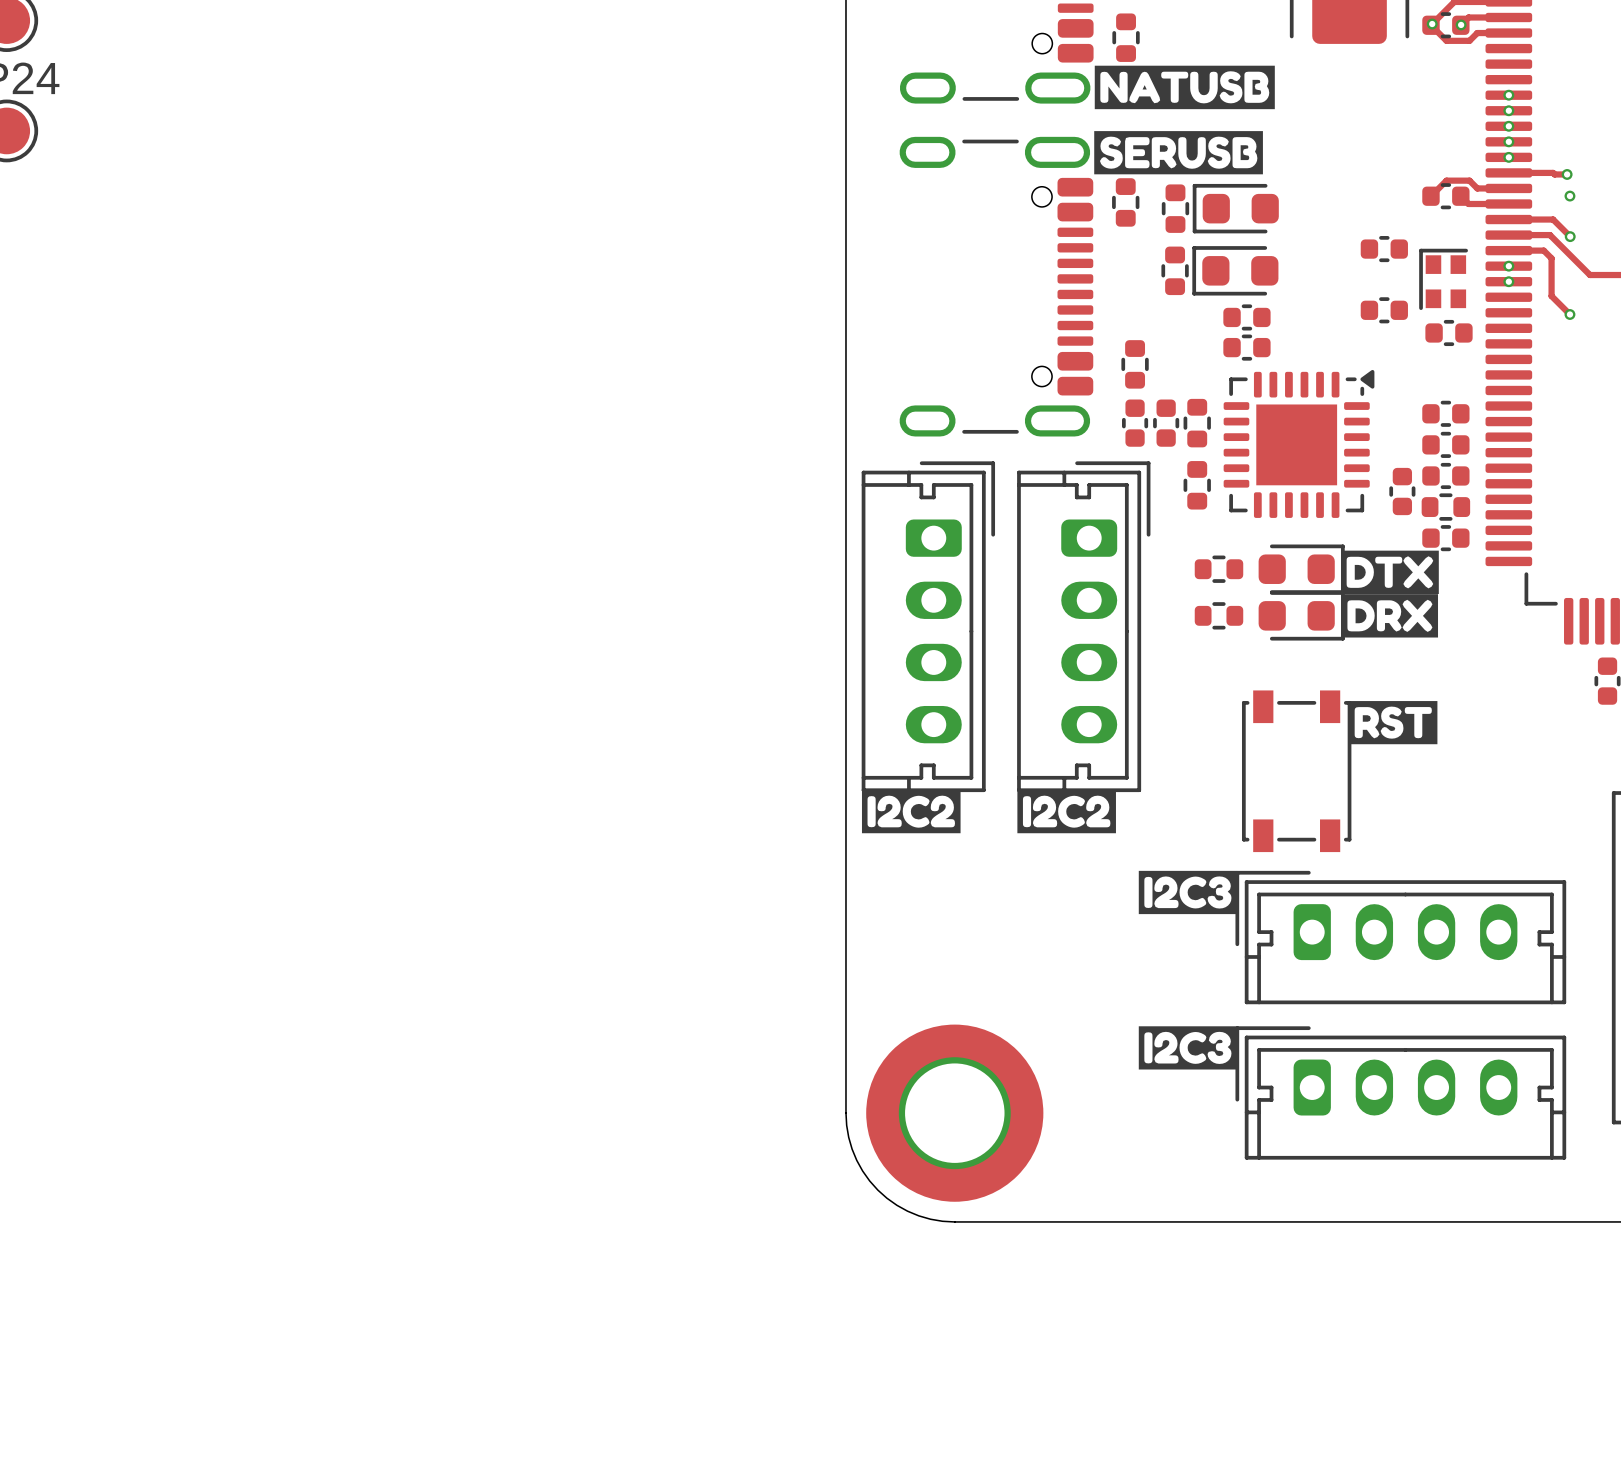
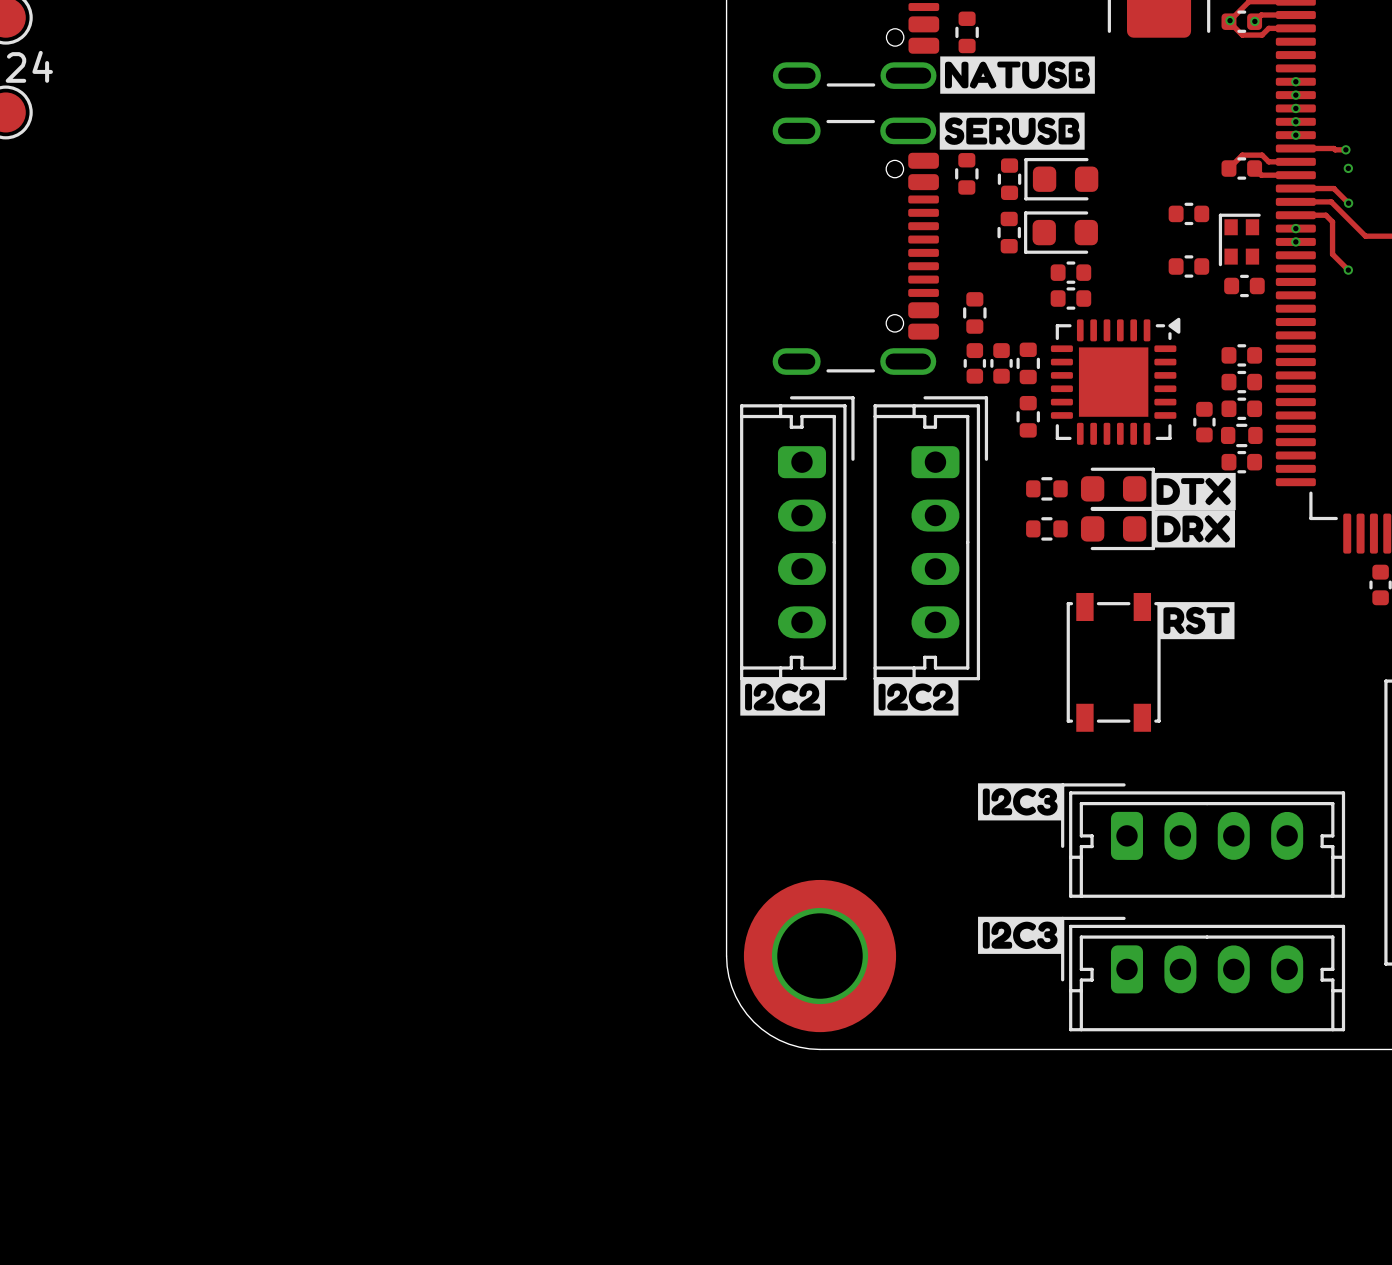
drawing position: (1187, 892) -> (1020, 801)
part position: (1400, 937) -> (1203, 840)
drawing position: (1187, 1047) -> (1020, 935)
part position: (1400, 1092) -> (1203, 974)

